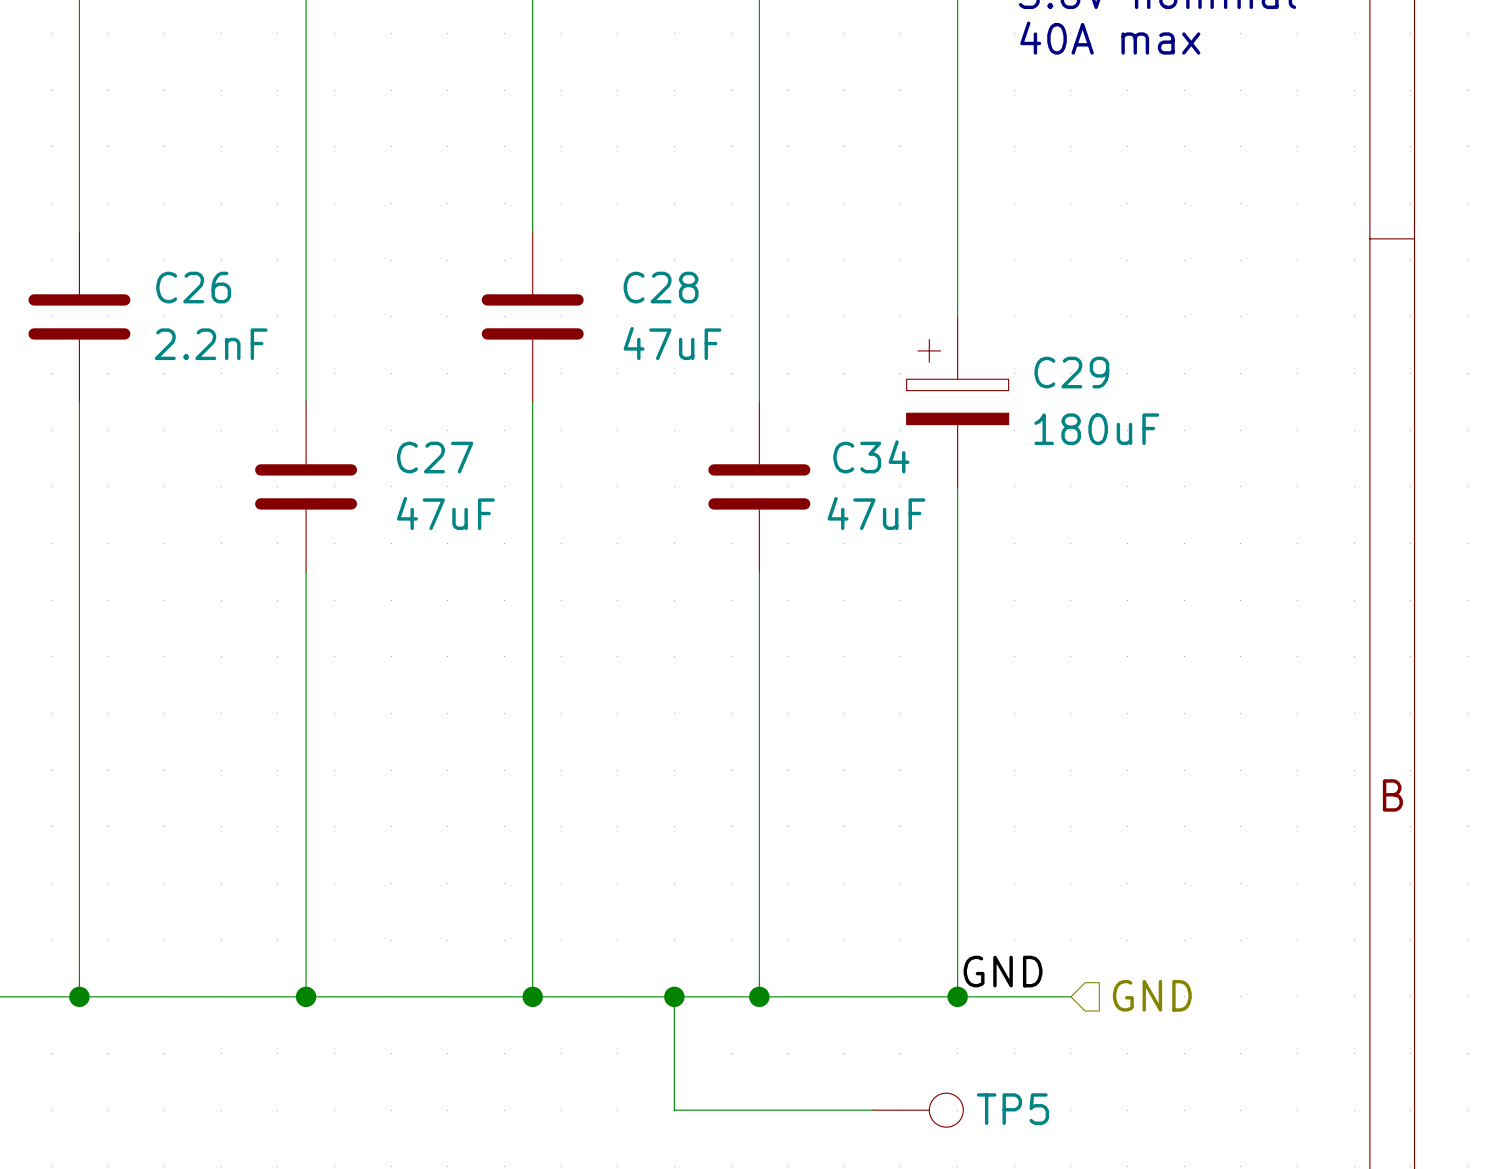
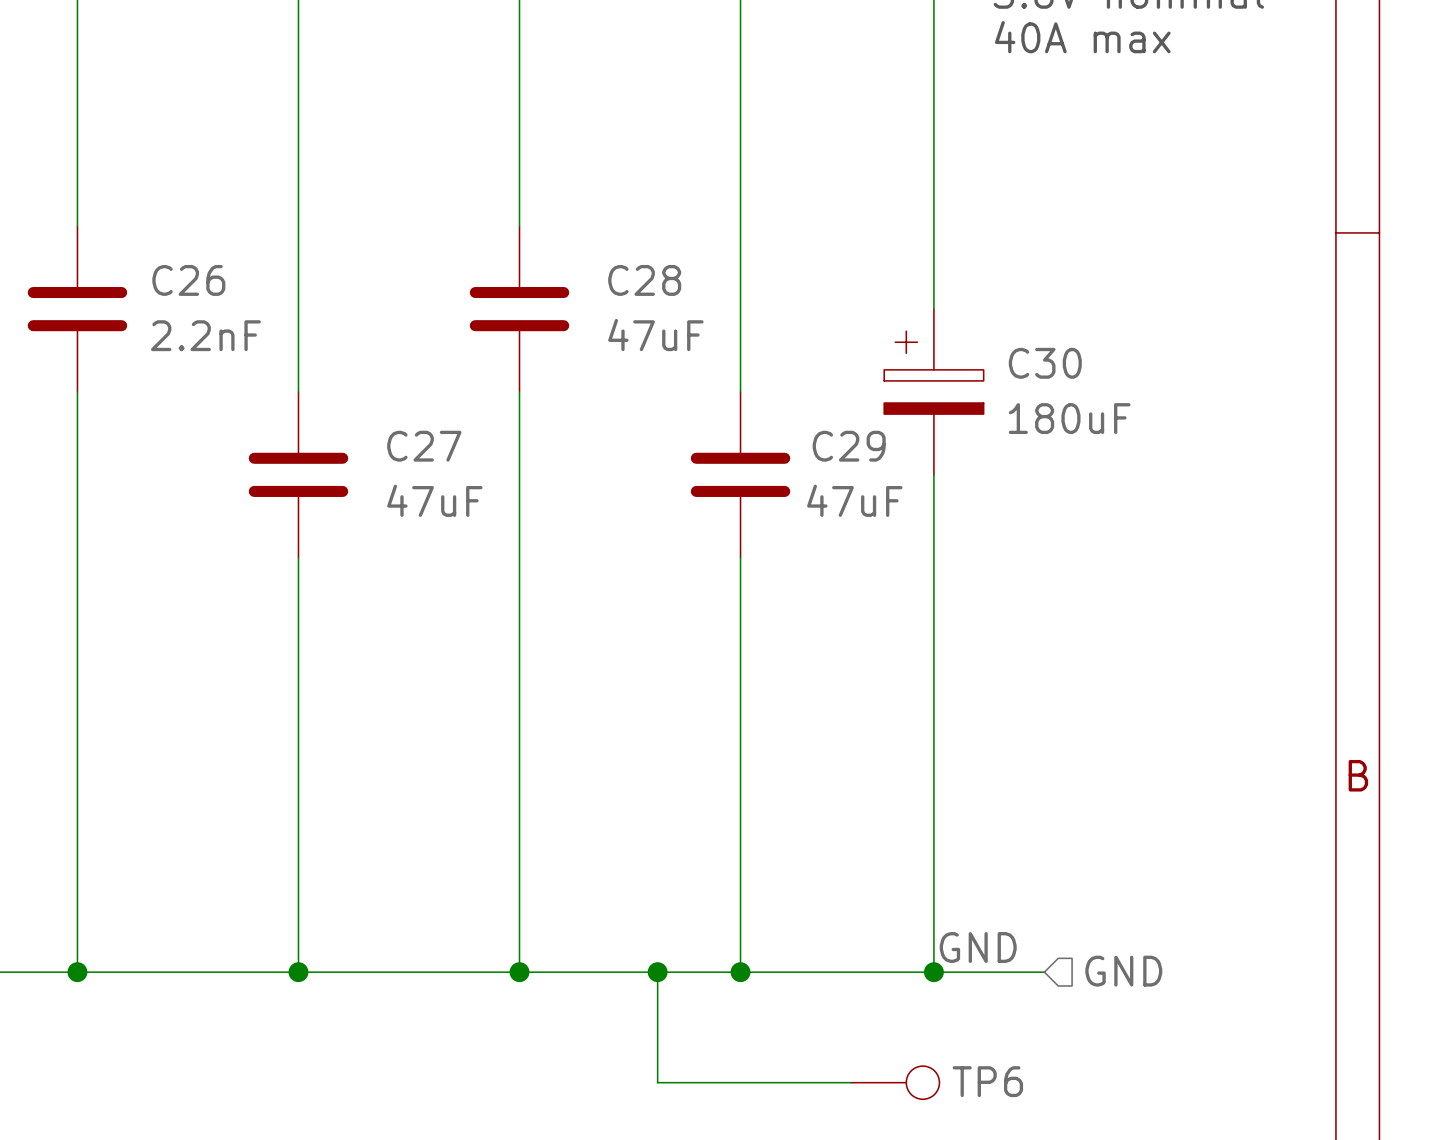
C29 name: C29 (1071, 372) -> C30 (1045, 363)
C34 name: C34 (871, 456) -> C29 (849, 446)
TP5 name: TP5 (1012, 1109) -> TP6 (987, 1081)

